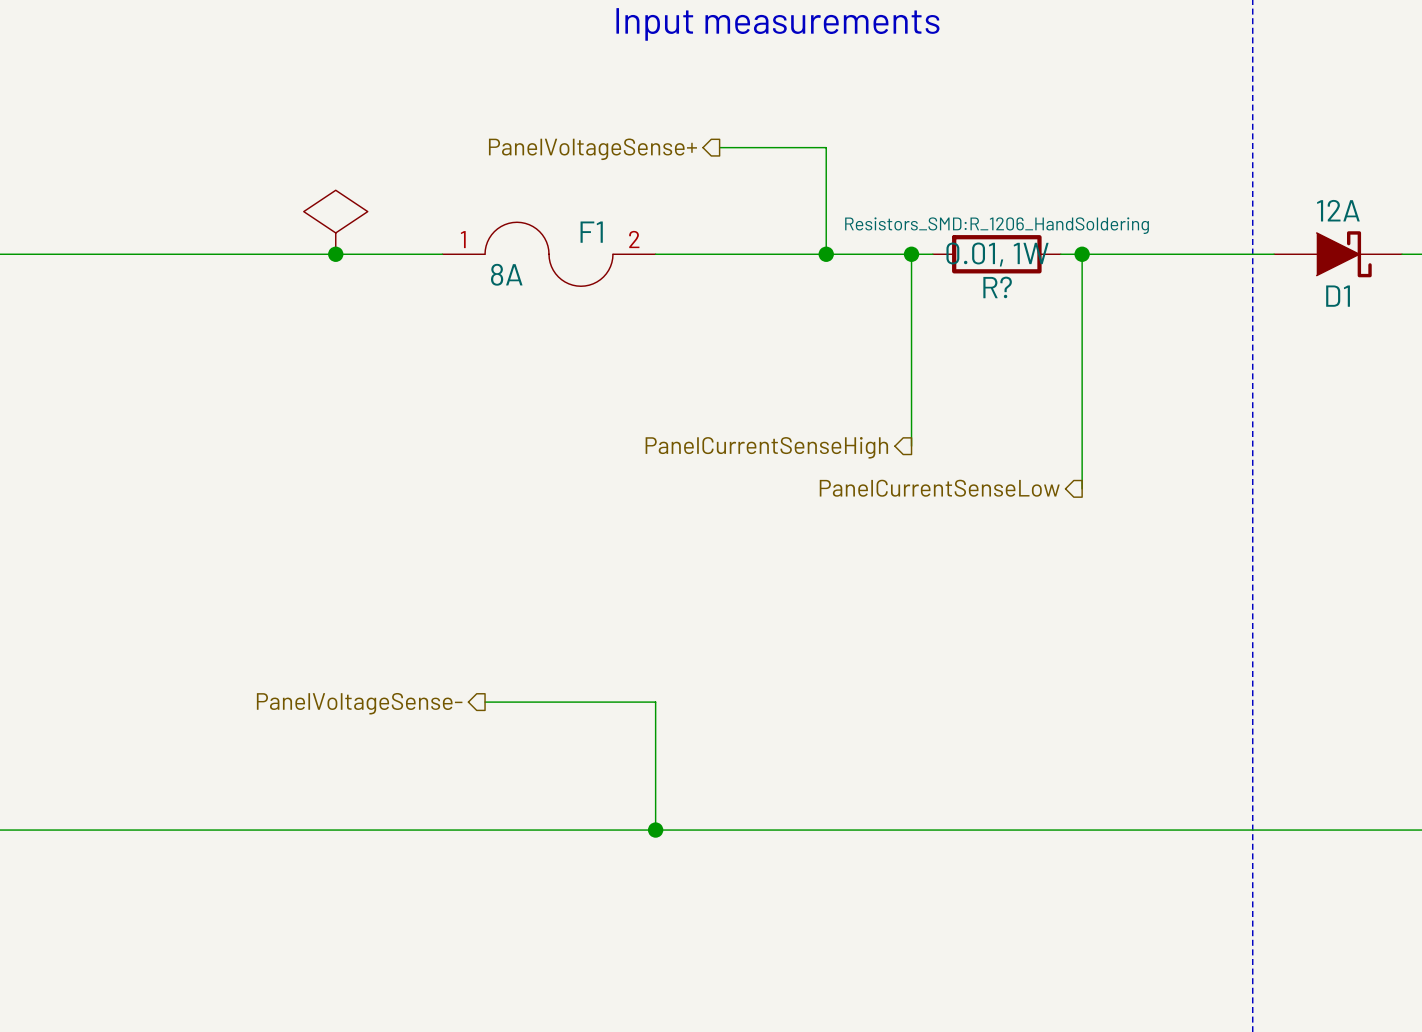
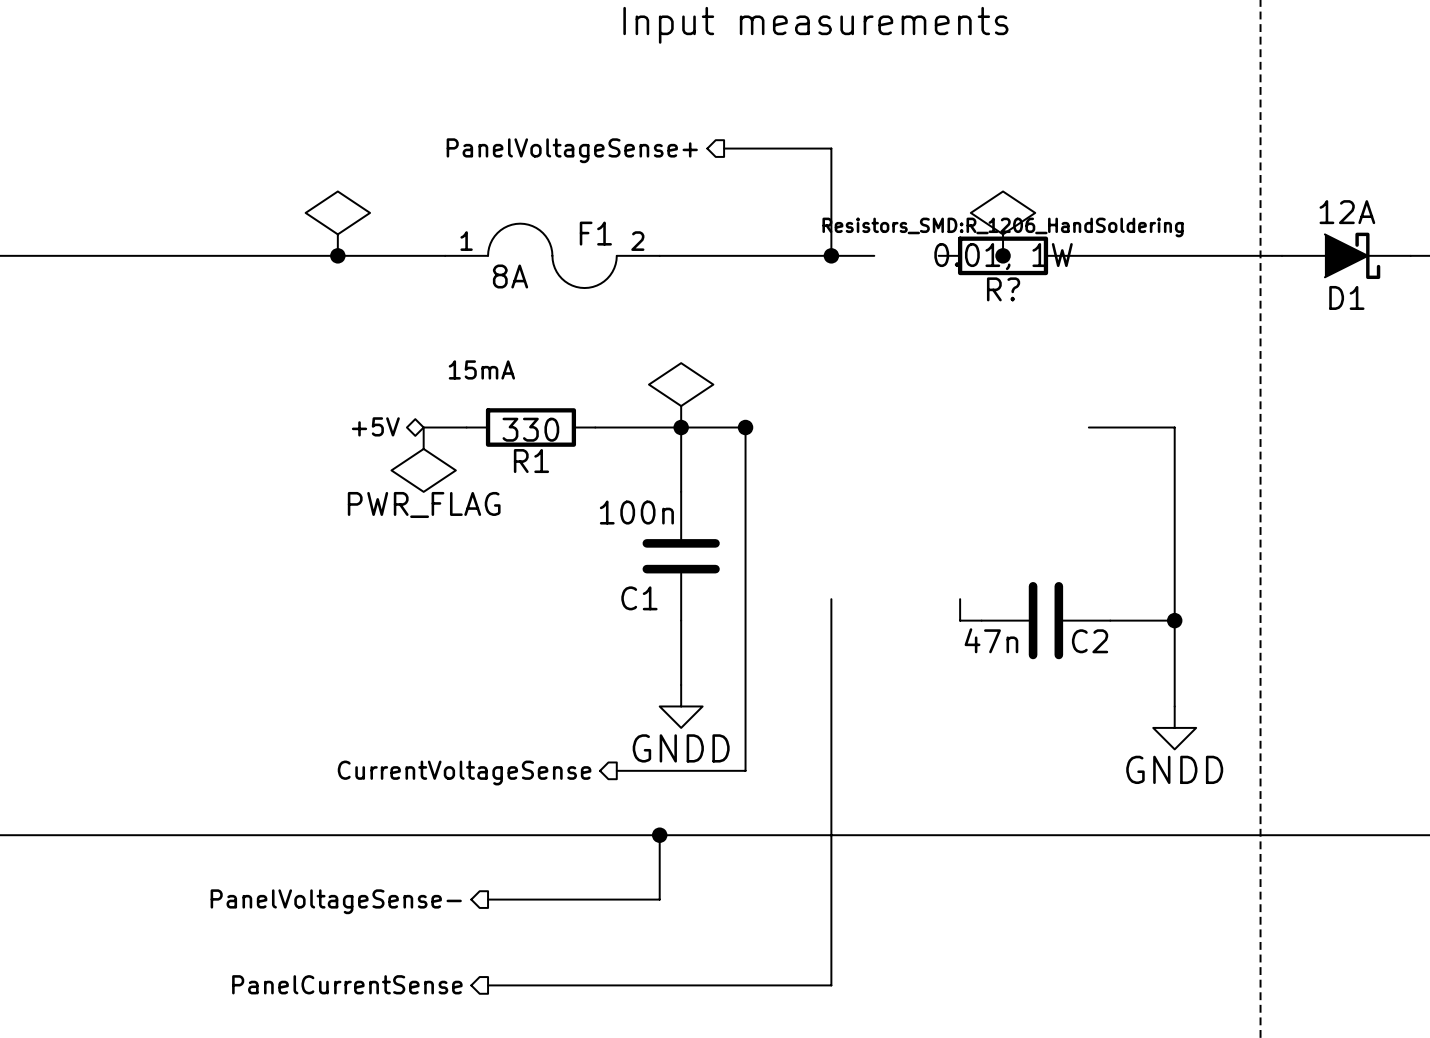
power symbol: none -> (1003, 223)
wire: (868, 254) (932, 254) -> none
wire: (911, 254) (911, 446) -> none
junction: (911, 254) -> none
junction: none -> (1003, 255)
wire: (1082, 254) (1082, 488) -> none
junction: (1082, 254) -> none
text: none -> 15mA (481, 369)
power symbol: none -> (681, 395)
hierarchical label: none -> +5V (375, 426)
wire: none -> (423, 427) (466, 427)
R1: none -> 330 (530, 427)
wire: none -> (595, 427) (745, 427) (745, 770) (616, 770)
wire: none -> (681, 427) (681, 491)
junction: none -> (681, 427)
junction: none -> (745, 427)
wire: none -> (1088, 427) (1174, 427) (1174, 706)
hierarchical label: PanelCurrentSenseHigh (766, 447) -> none
power symbol: none -> PWR_FLAG (423, 459)
hierarchical label: PanelCurrentSenseLow (939, 488) -> none
C1: none -> 100n (681, 556)
wire: none -> (831, 599) (831, 985) (488, 985)
wire: none -> (960, 599) (960, 620) (981, 620)
wire: none -> (681, 620) (681, 685)
C2: none -> 47n (1045, 620)
wire: none -> (1110, 620) (1174, 620)
junction: none -> (1174, 620)
wire: (485, 702) (655, 702) (655, 830) -> (488, 899) (659, 899) (659, 835)
power symbol: none -> GNDD (681, 706)
hierarchical label position: PanelVoltageSense- (359, 703) -> PanelVoltageSense- (336, 901)
power symbol: none -> GNDD (1174, 727)
hierarchical label: none -> CurrentVoltageSense (464, 773)
hierarchical label: none -> PanelCurrentSense (347, 984)

